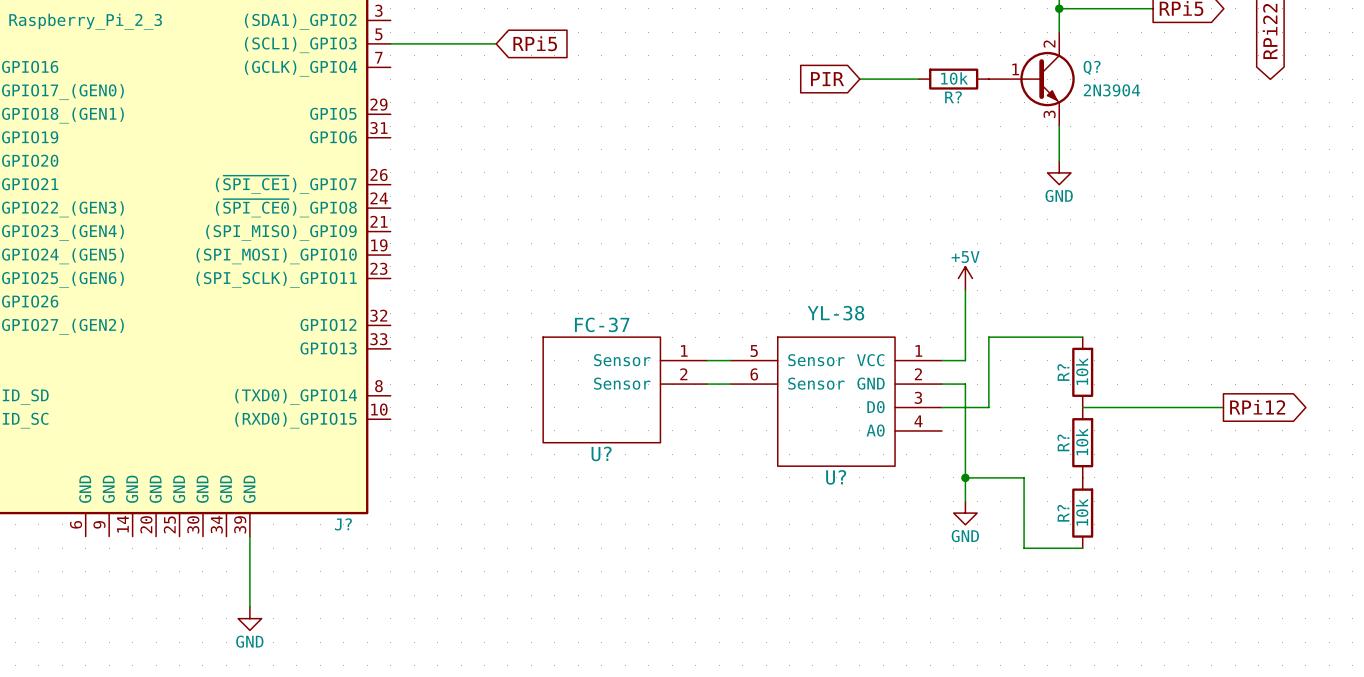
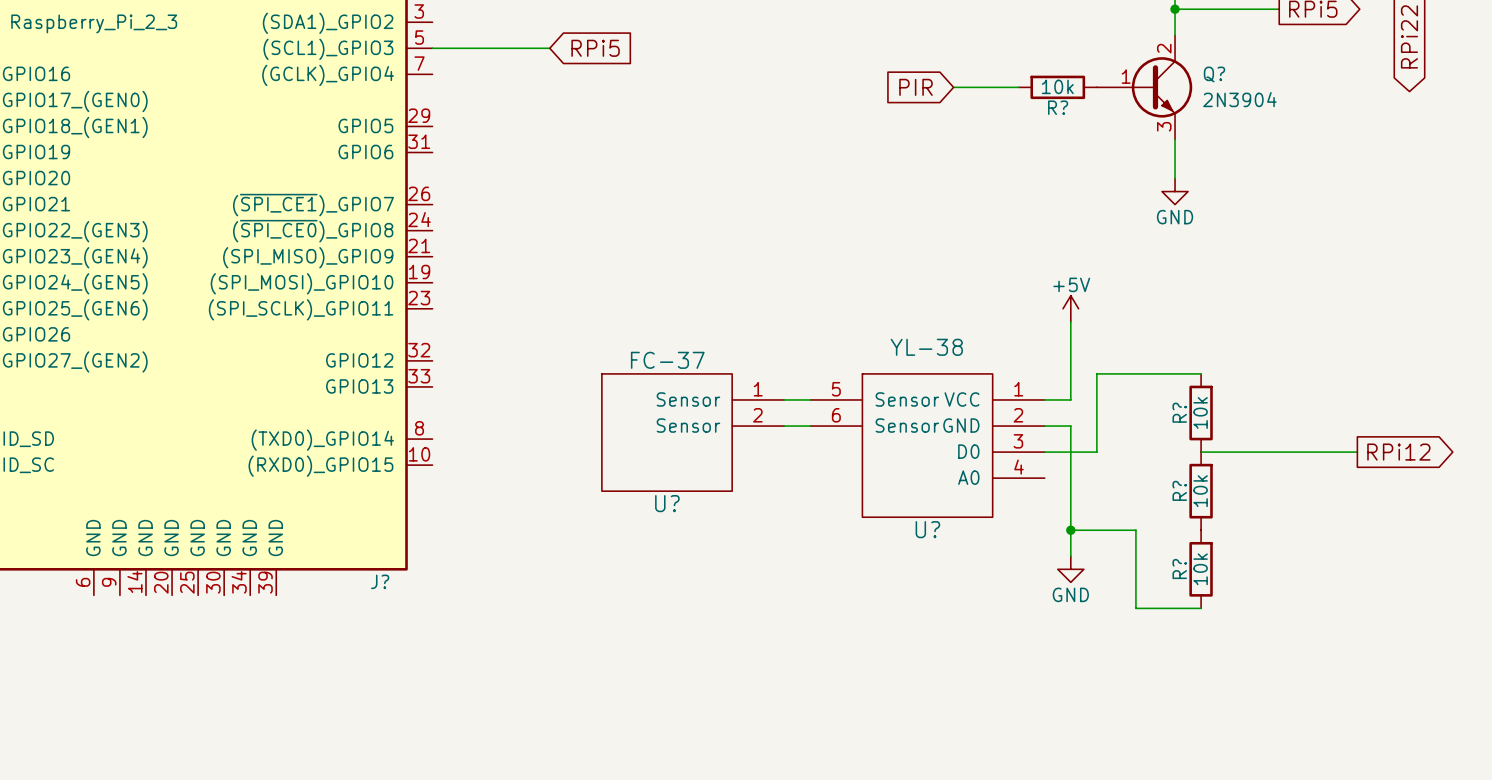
wire: (249, 536) (249, 606) -> none
power symbol: GND (249, 618) -> none

